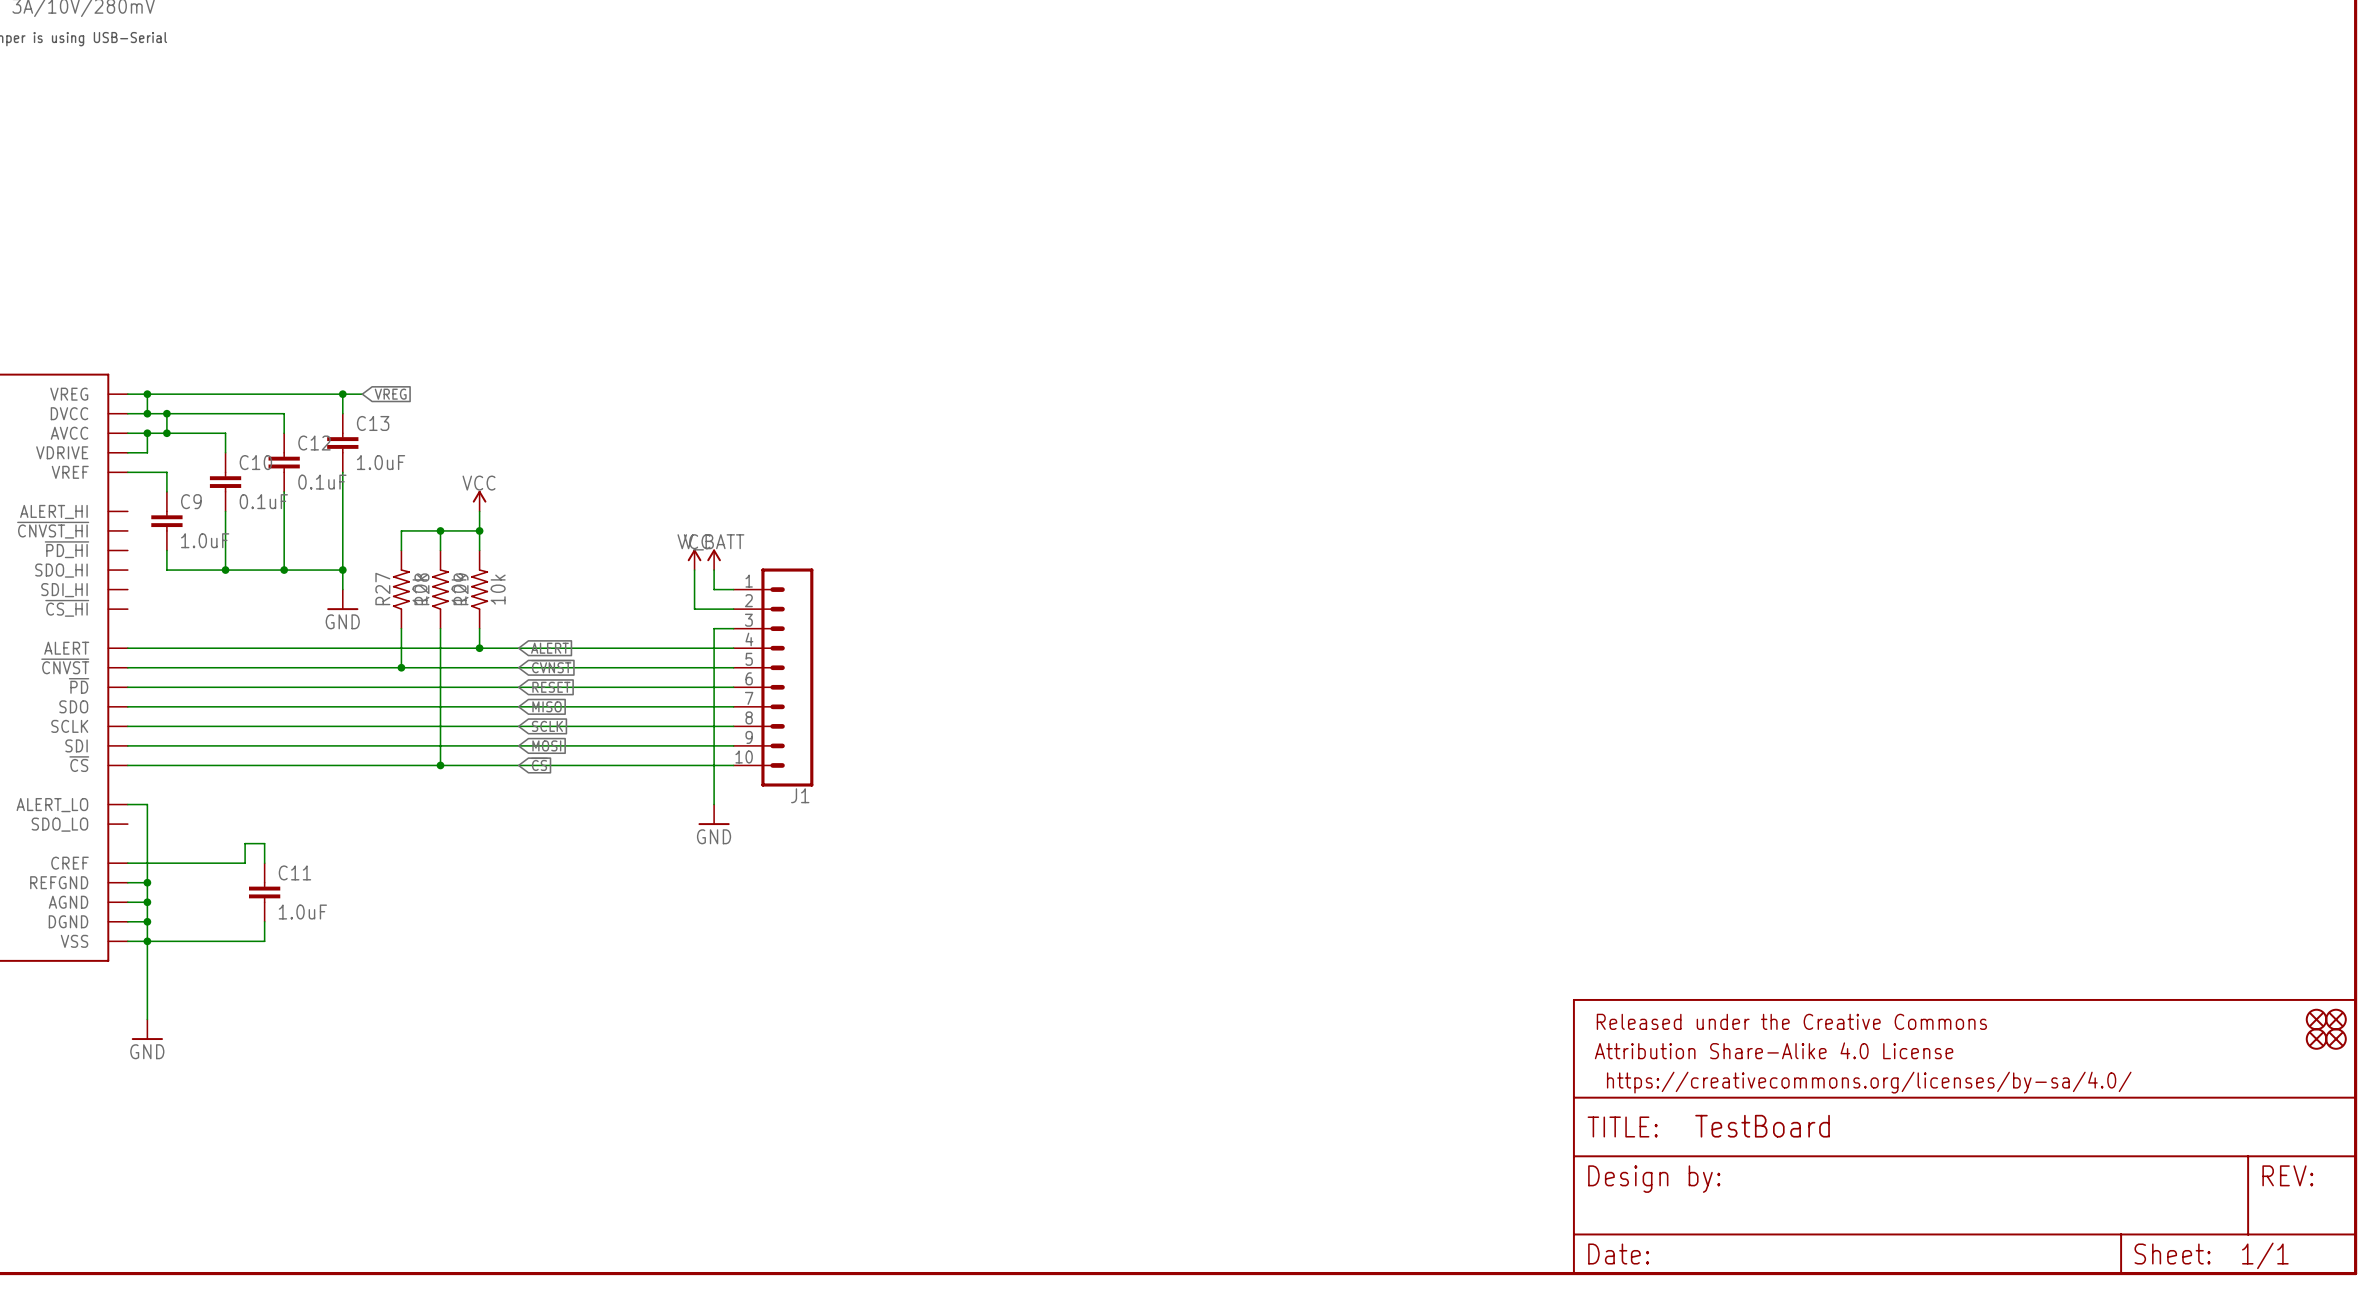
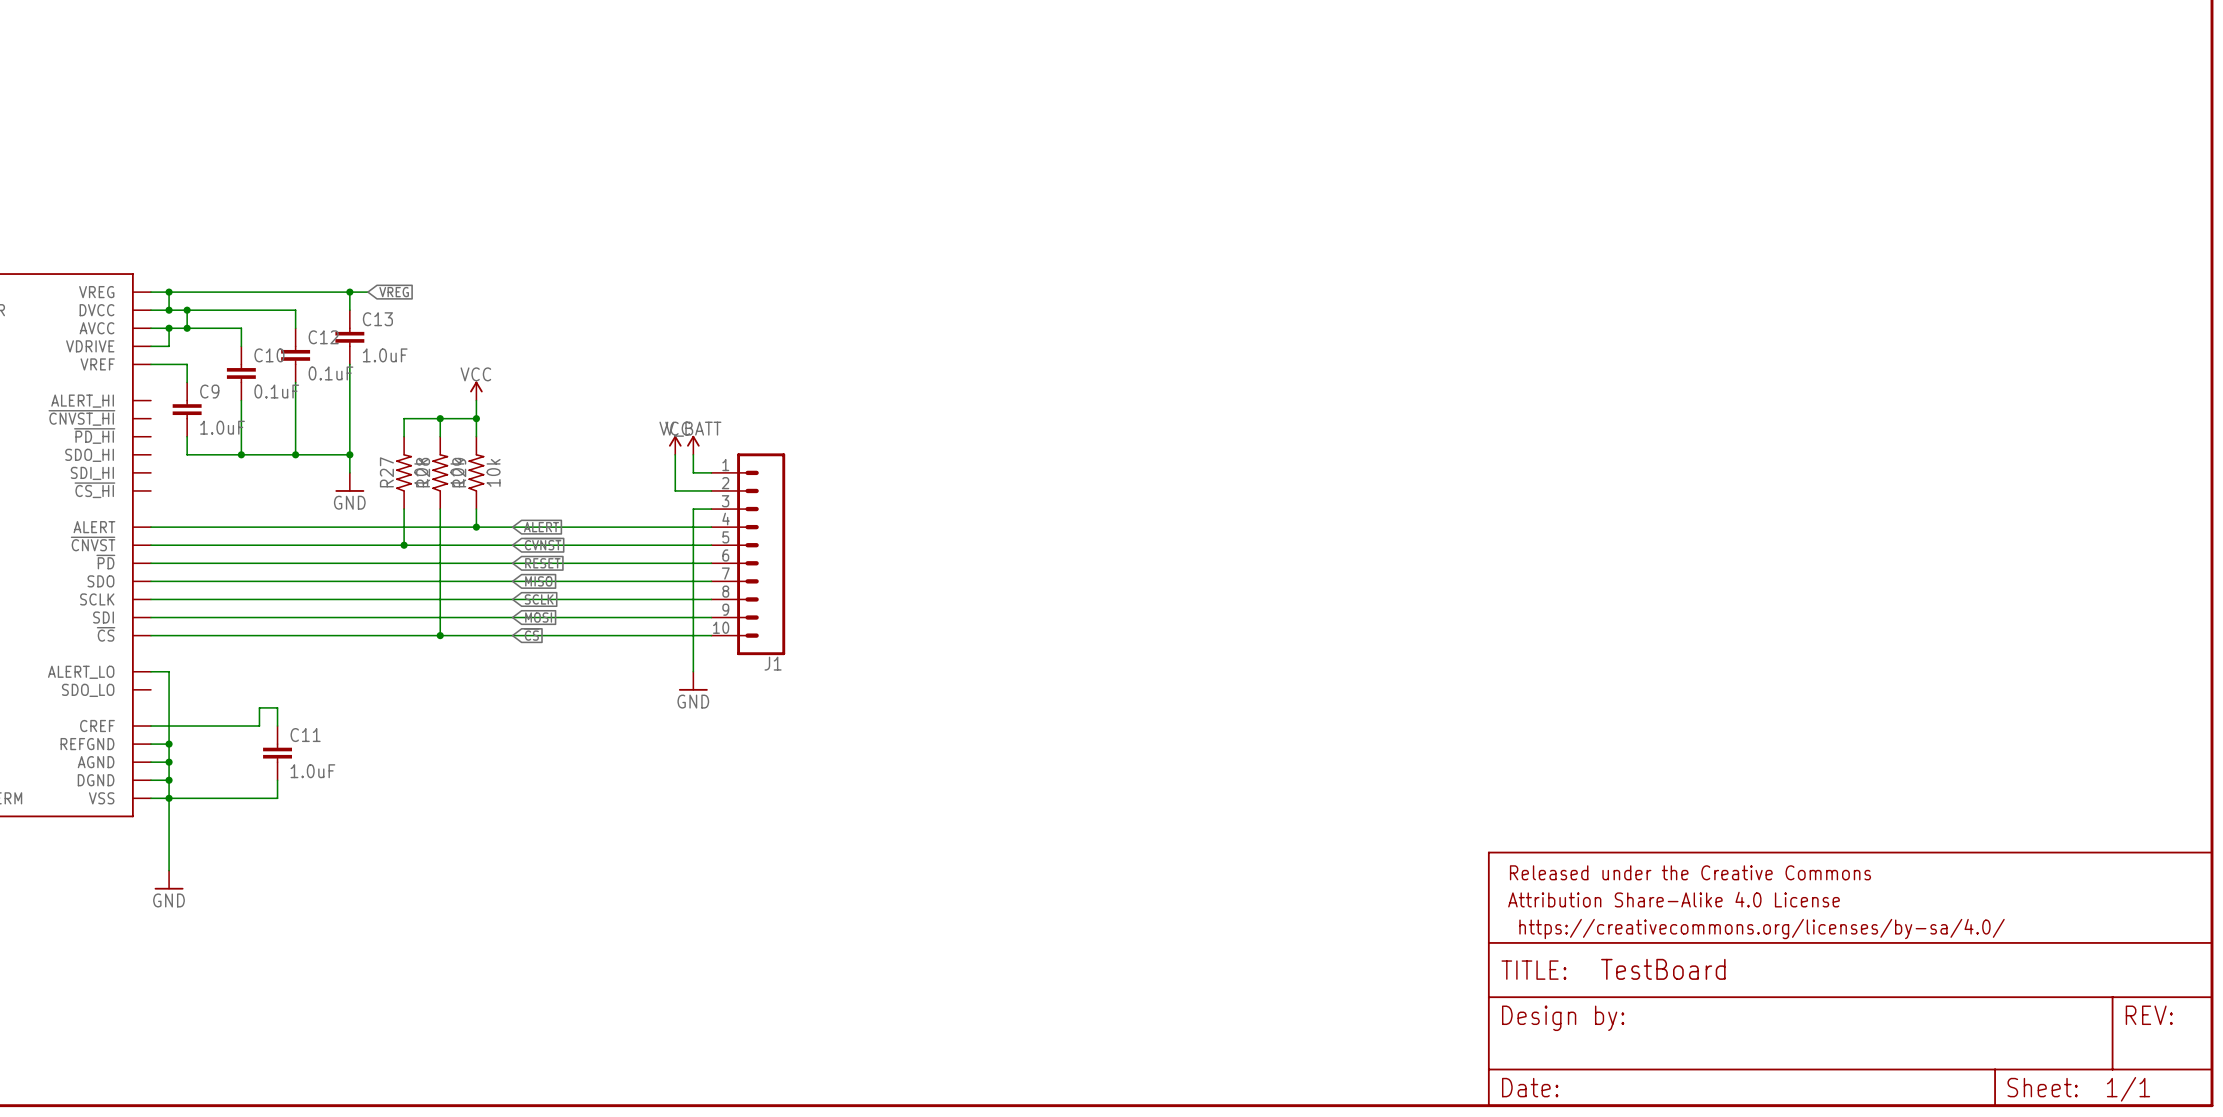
part: (2316, 1019) -> none
part: (2336, 1019) -> none
part: (2316, 1039) -> none
part: (2336, 1039) -> none

